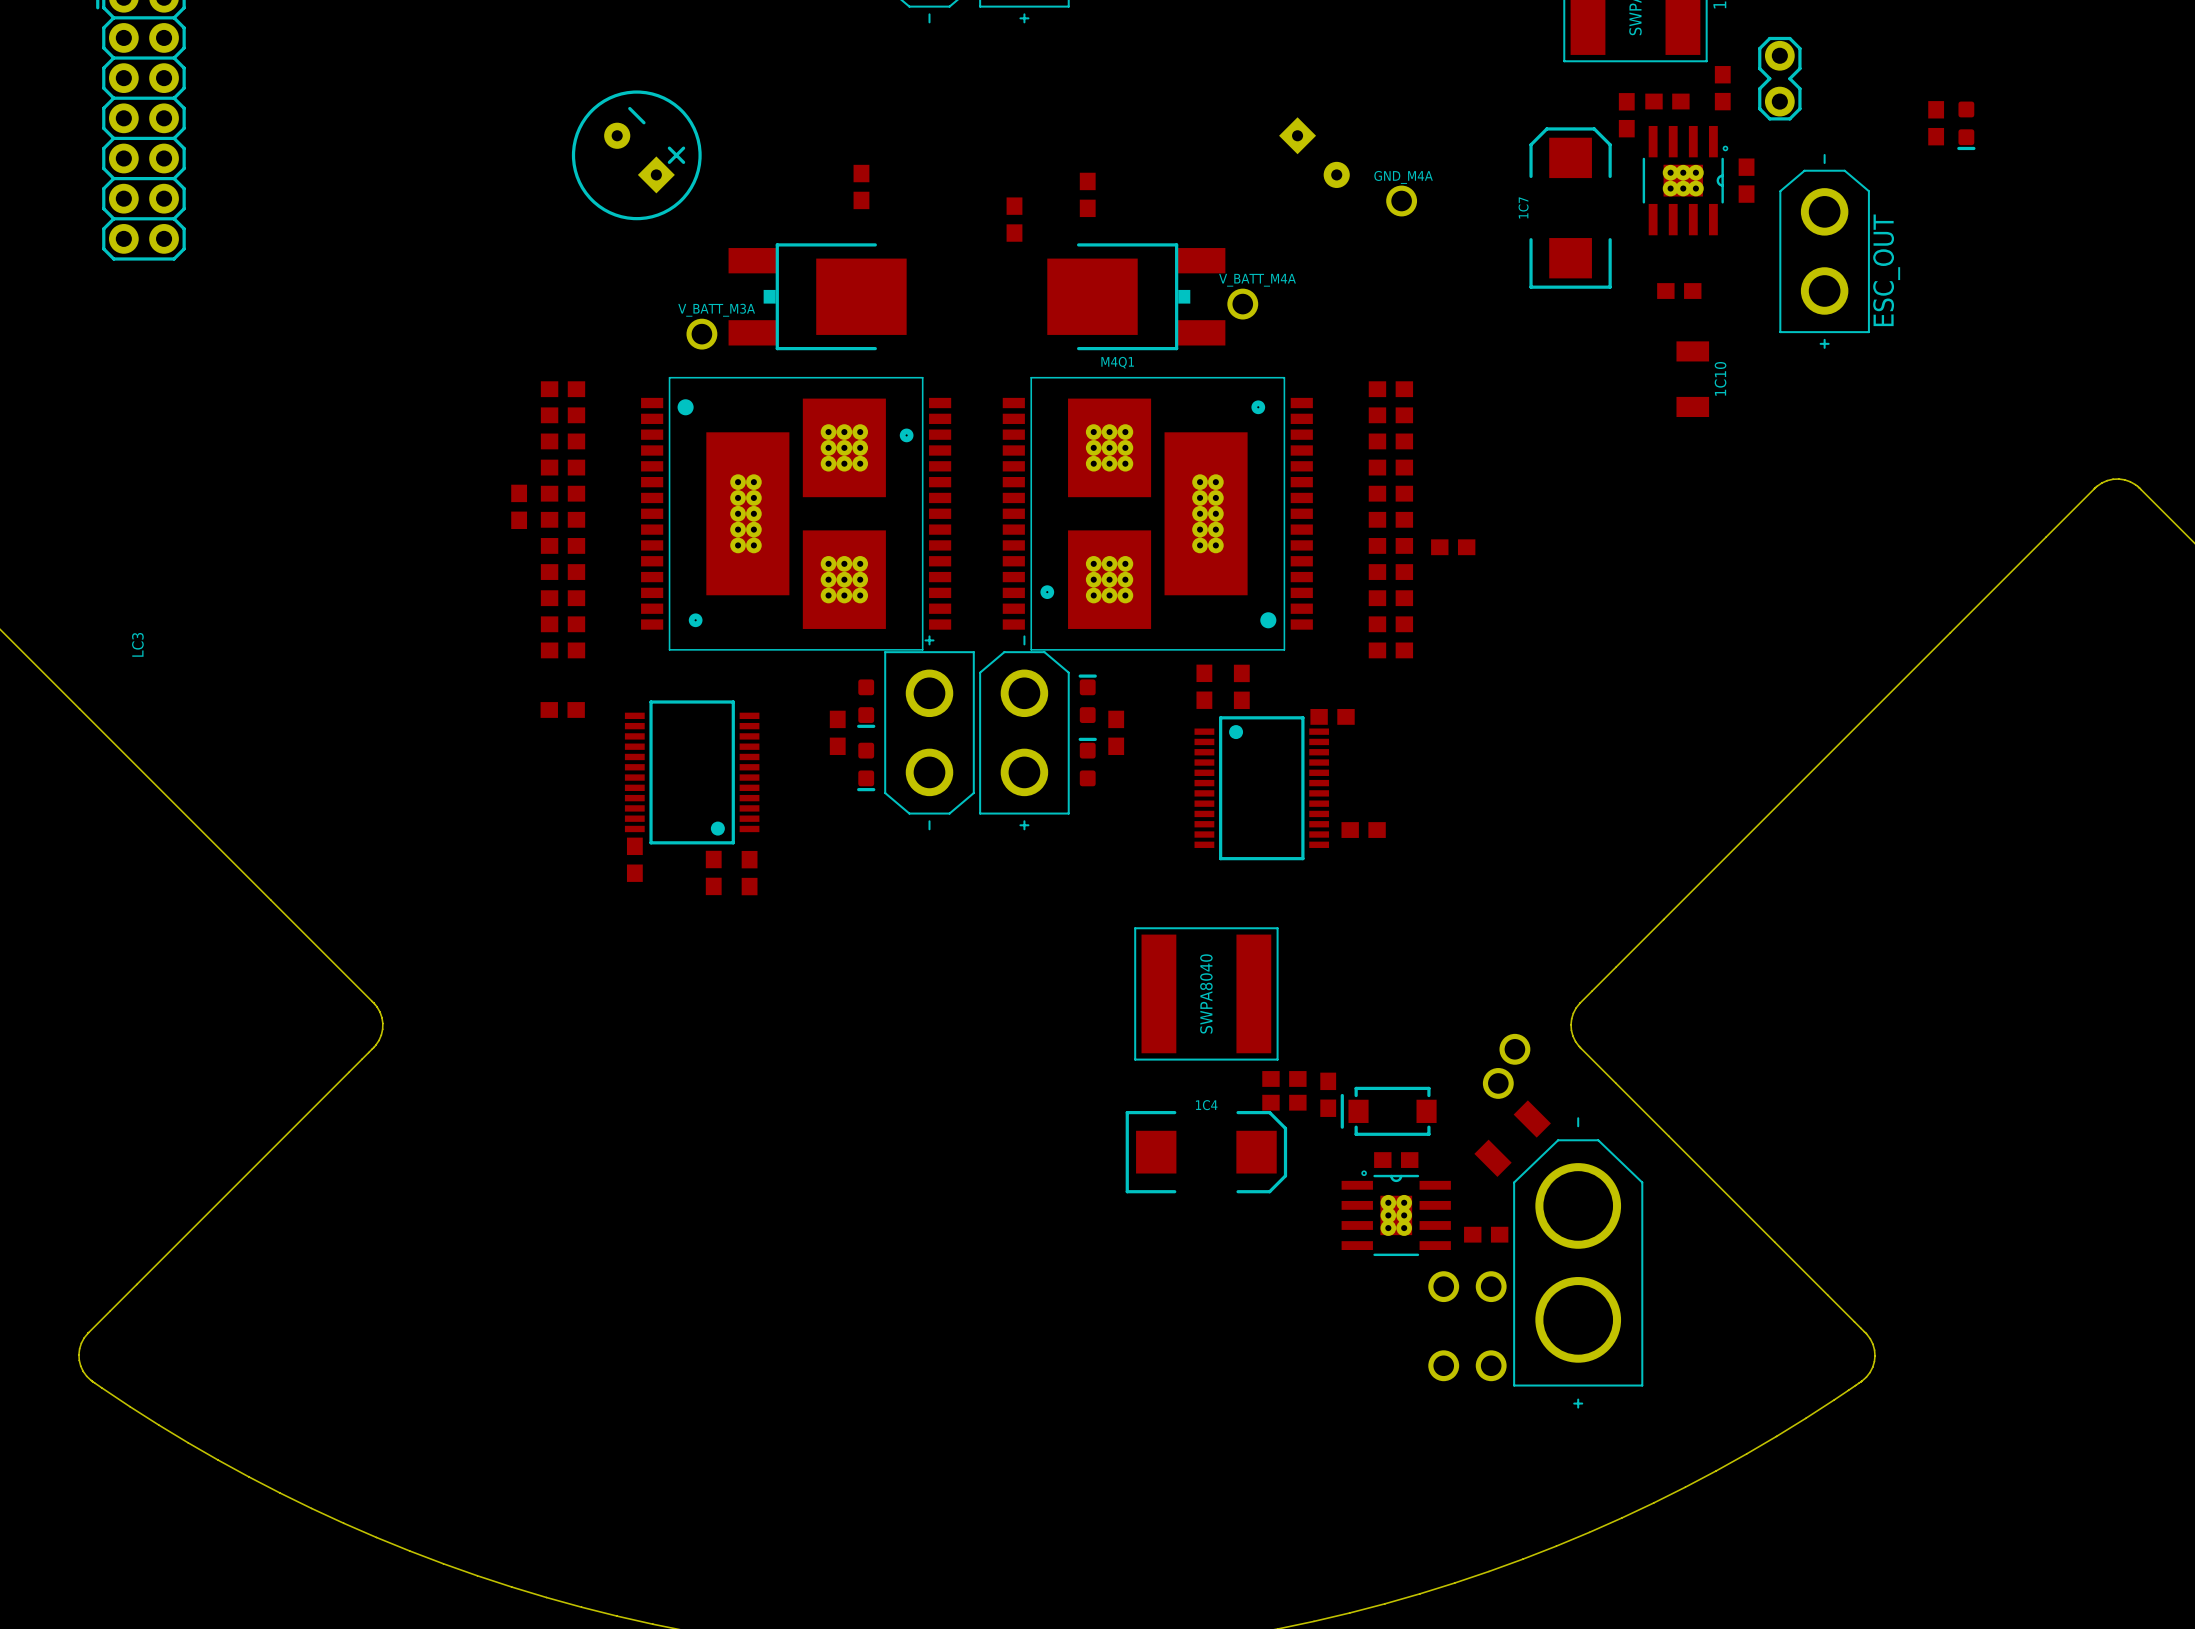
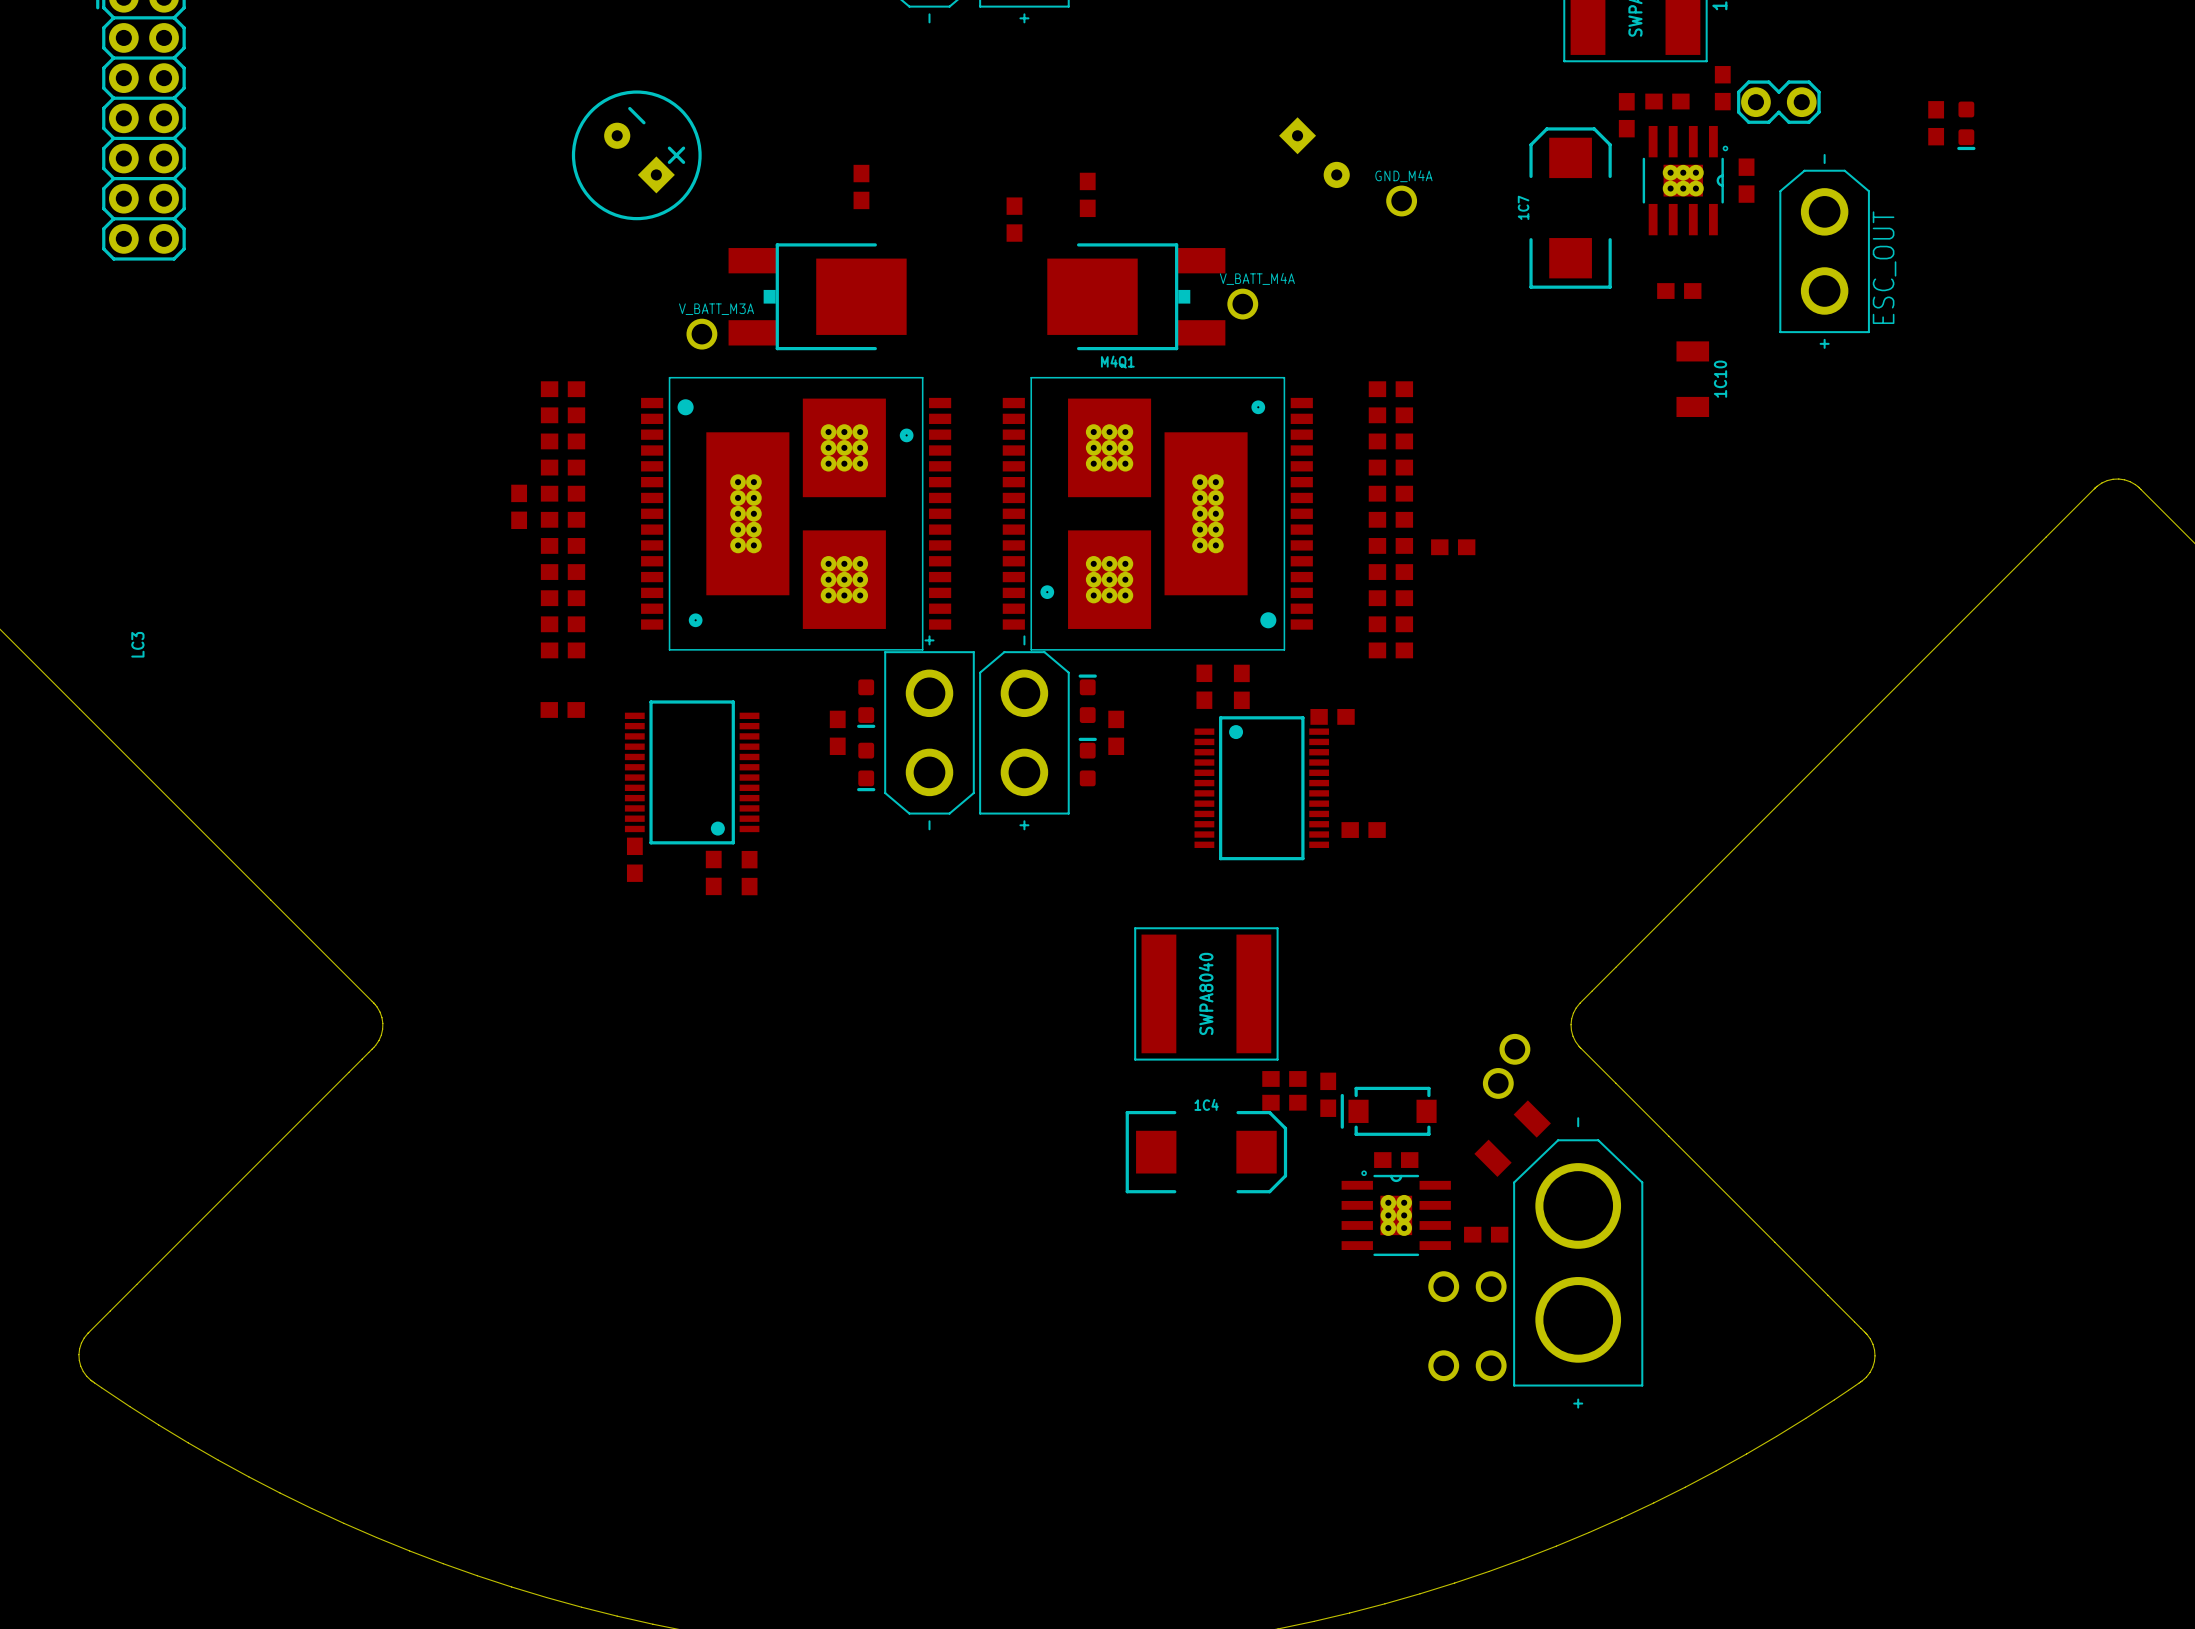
part rotation: 0° (1779, 78) -> 90° clockwise (1778, 102)

